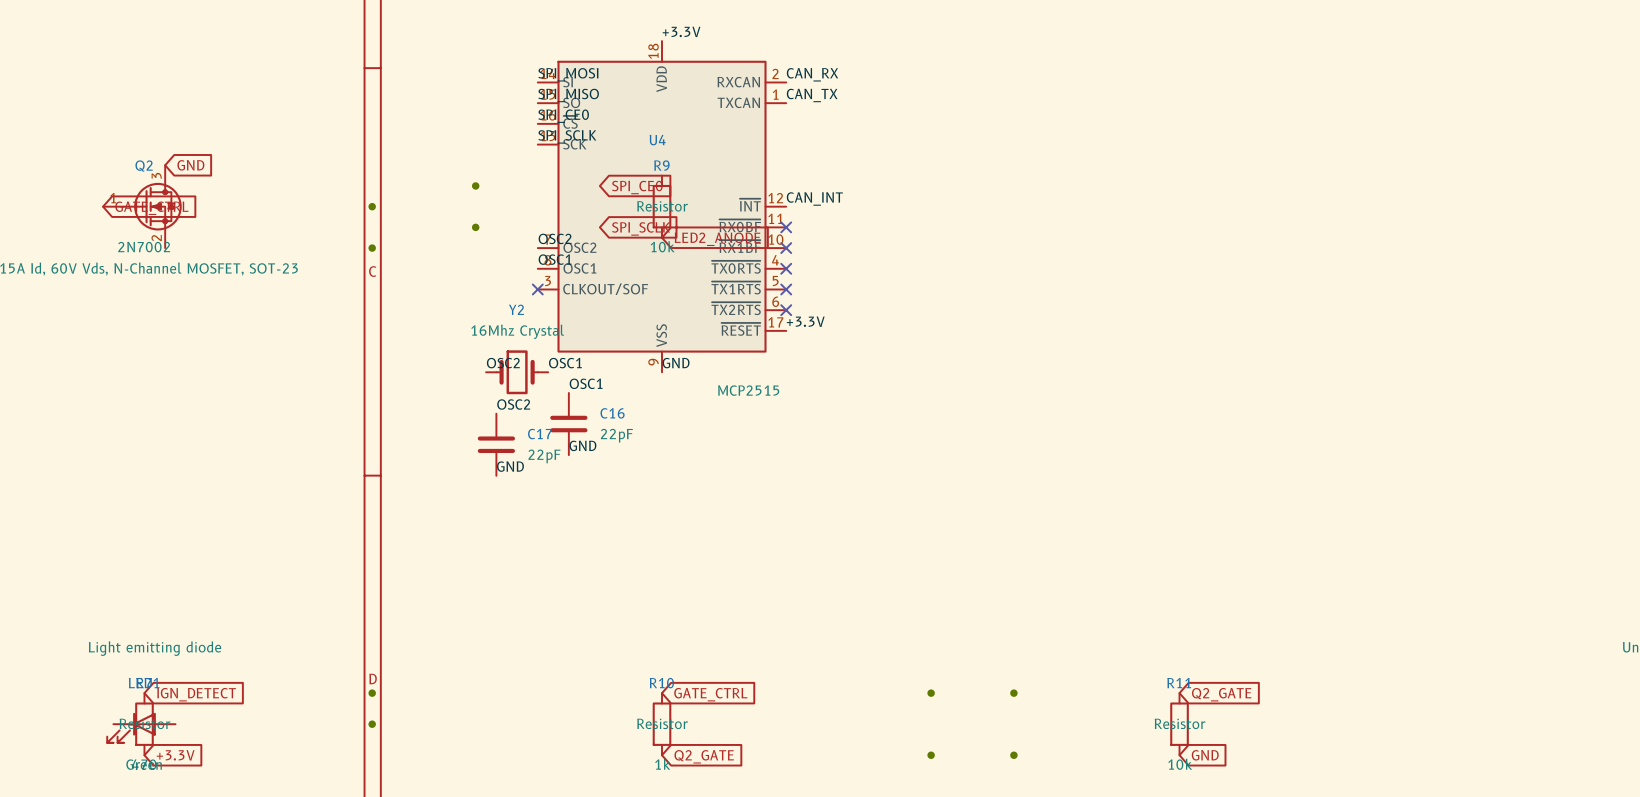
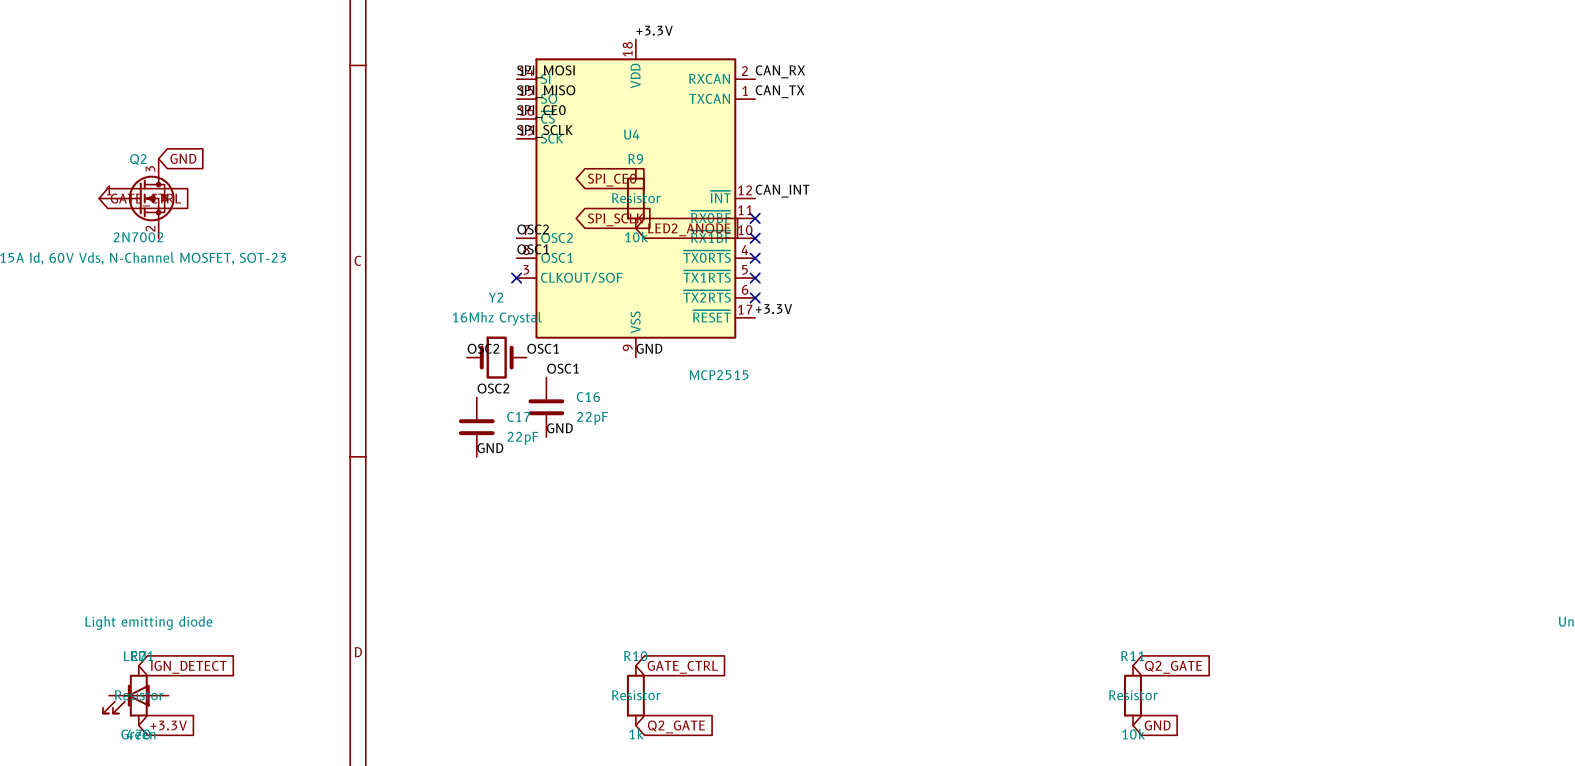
junction: (475, 185) -> none
junction: (372, 206) -> none
junction: (475, 227) -> none
junction: (372, 248) -> none
junction: (372, 693) -> none
junction: (931, 693) -> none
junction: (1013, 693) -> none
junction: (372, 724) -> none
junction: (931, 755) -> none
junction: (1013, 755) -> none

